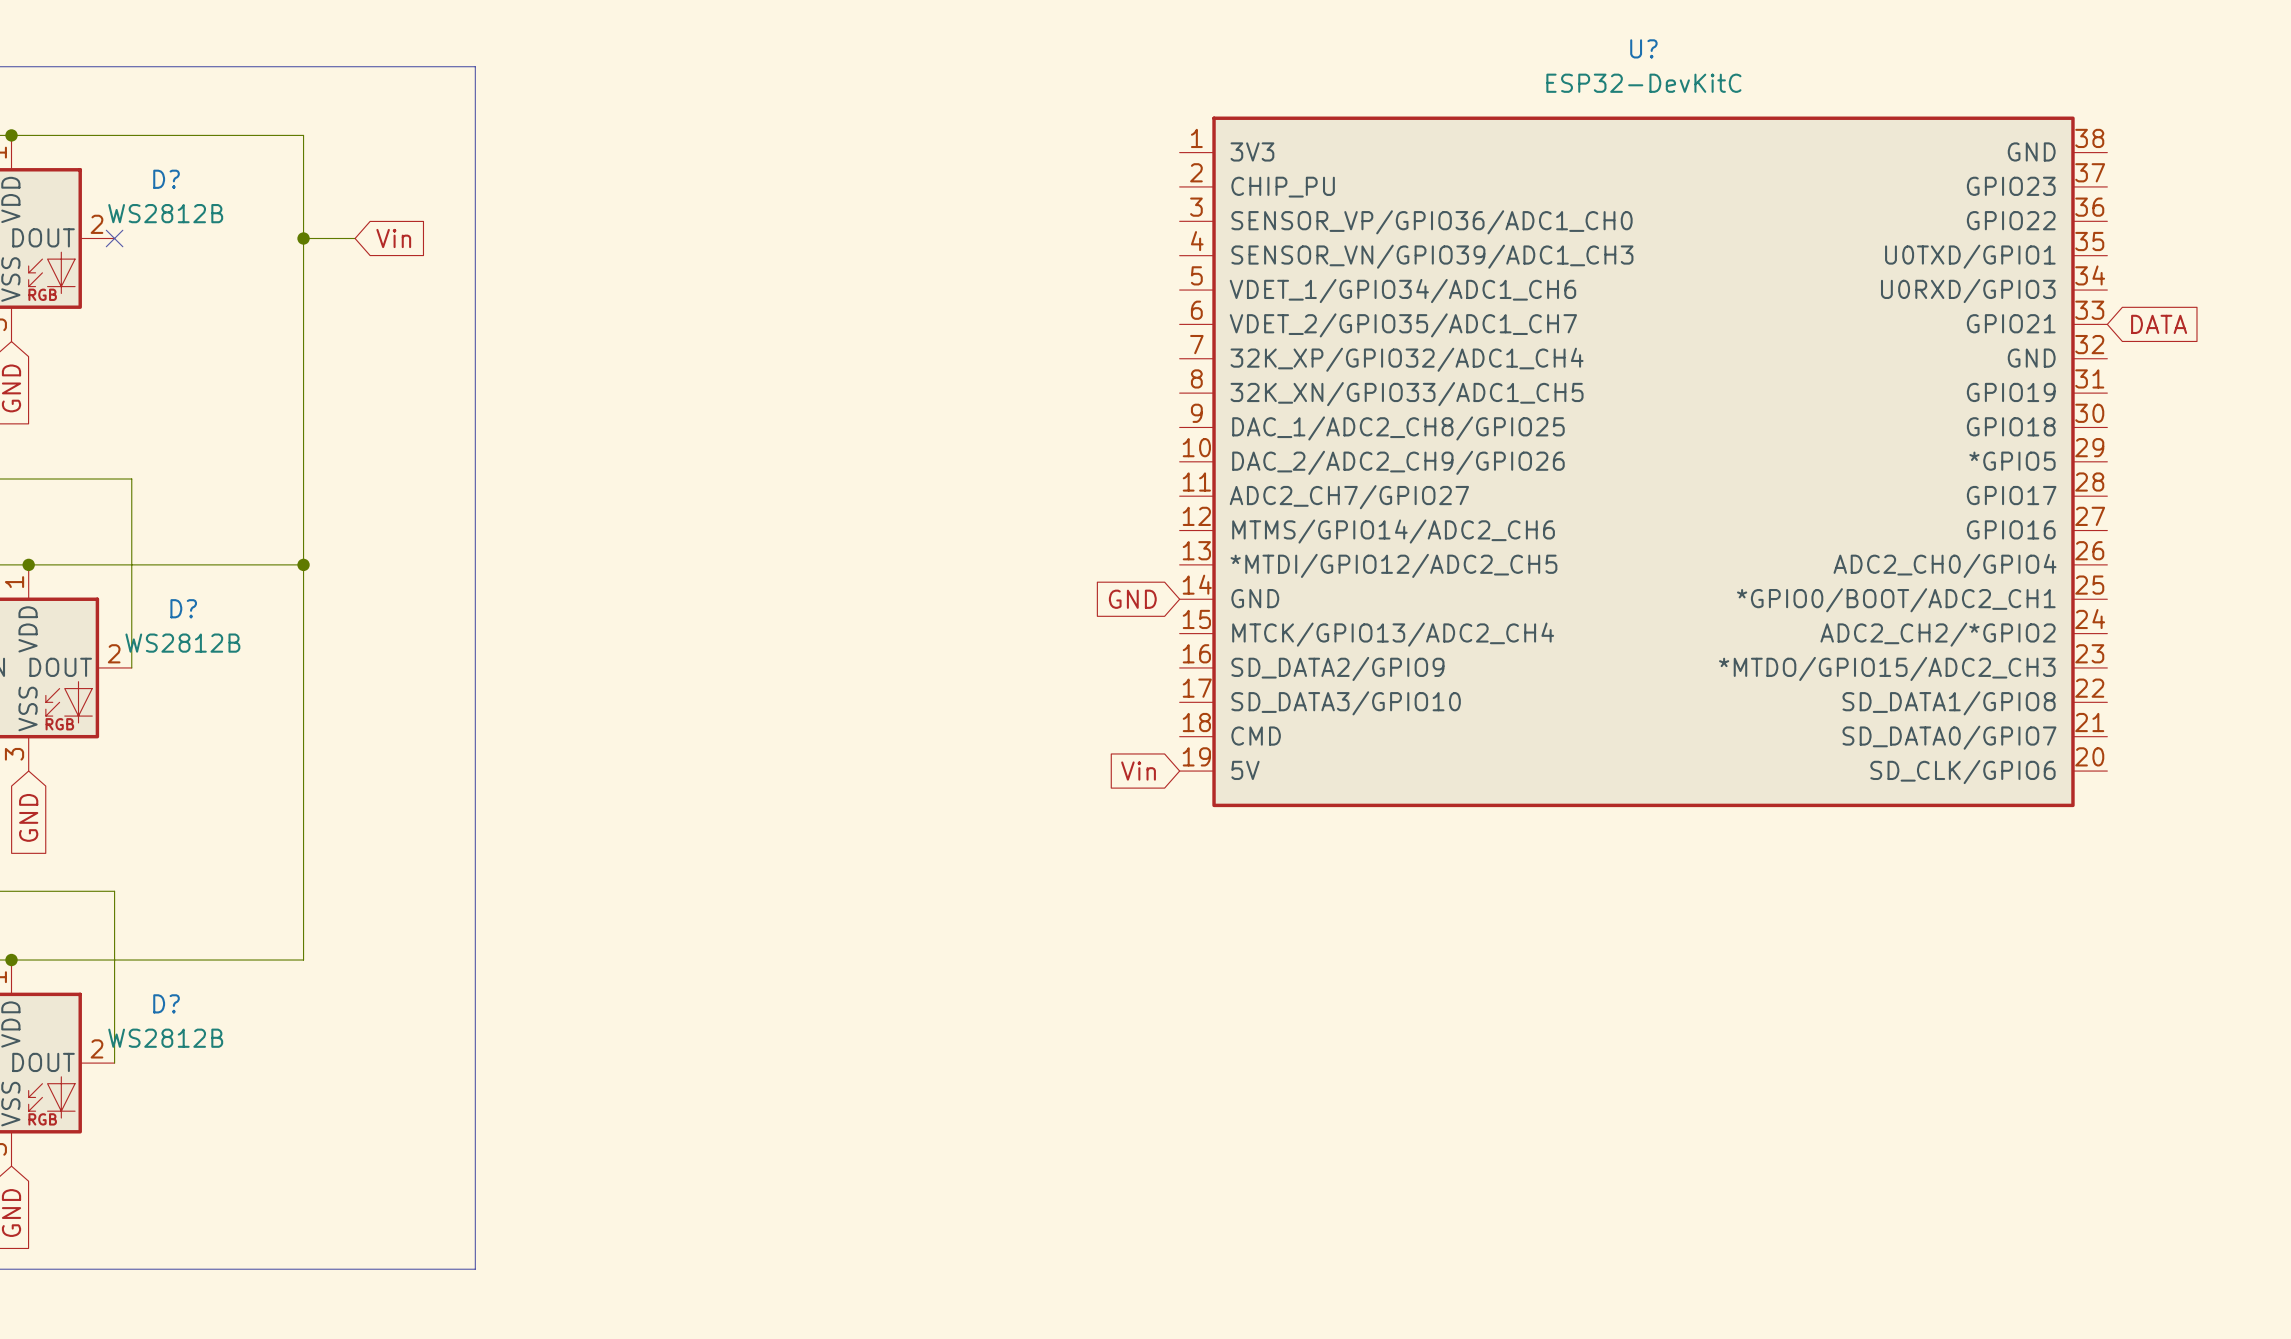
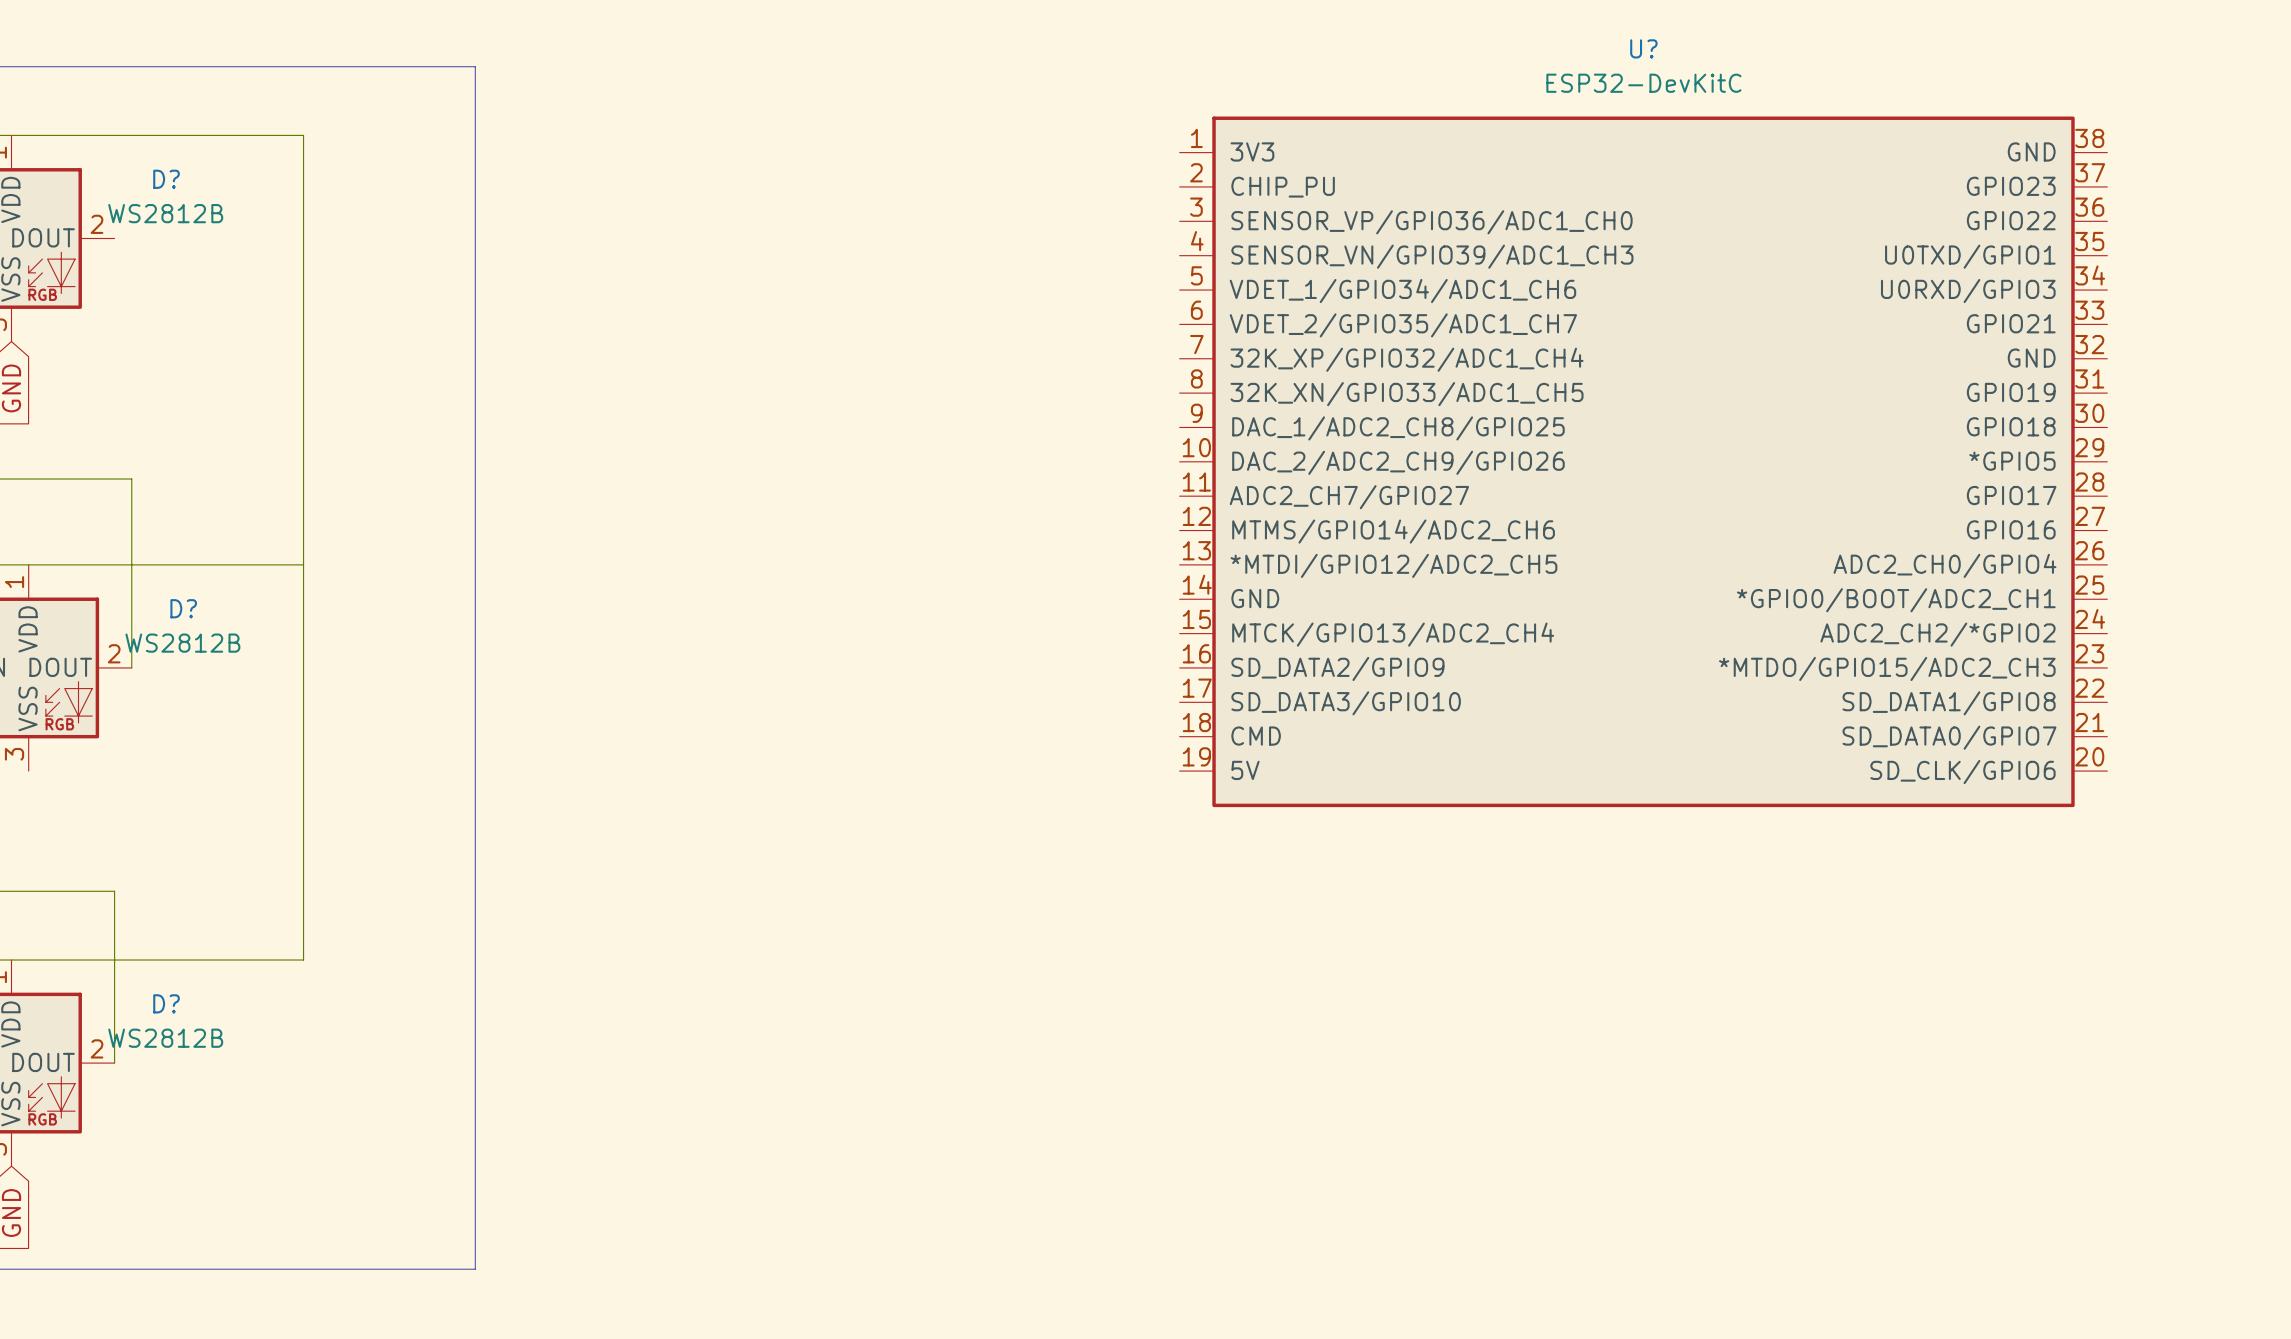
junction: (11, 135) -> none
no-connect mark: (114, 238) -> none
wire: (303, 238) (355, 238) -> none
junction: (303, 238) -> none
global label: Vin (393, 238) -> none
global label: DATA (2159, 324) -> none
junction: (28, 564) -> none
junction: (303, 564) -> none
global label: GND (1132, 599) -> none
global label: Vin (1138, 771) -> none
global label: GND (28, 817) -> none
junction: (11, 960) -> none

